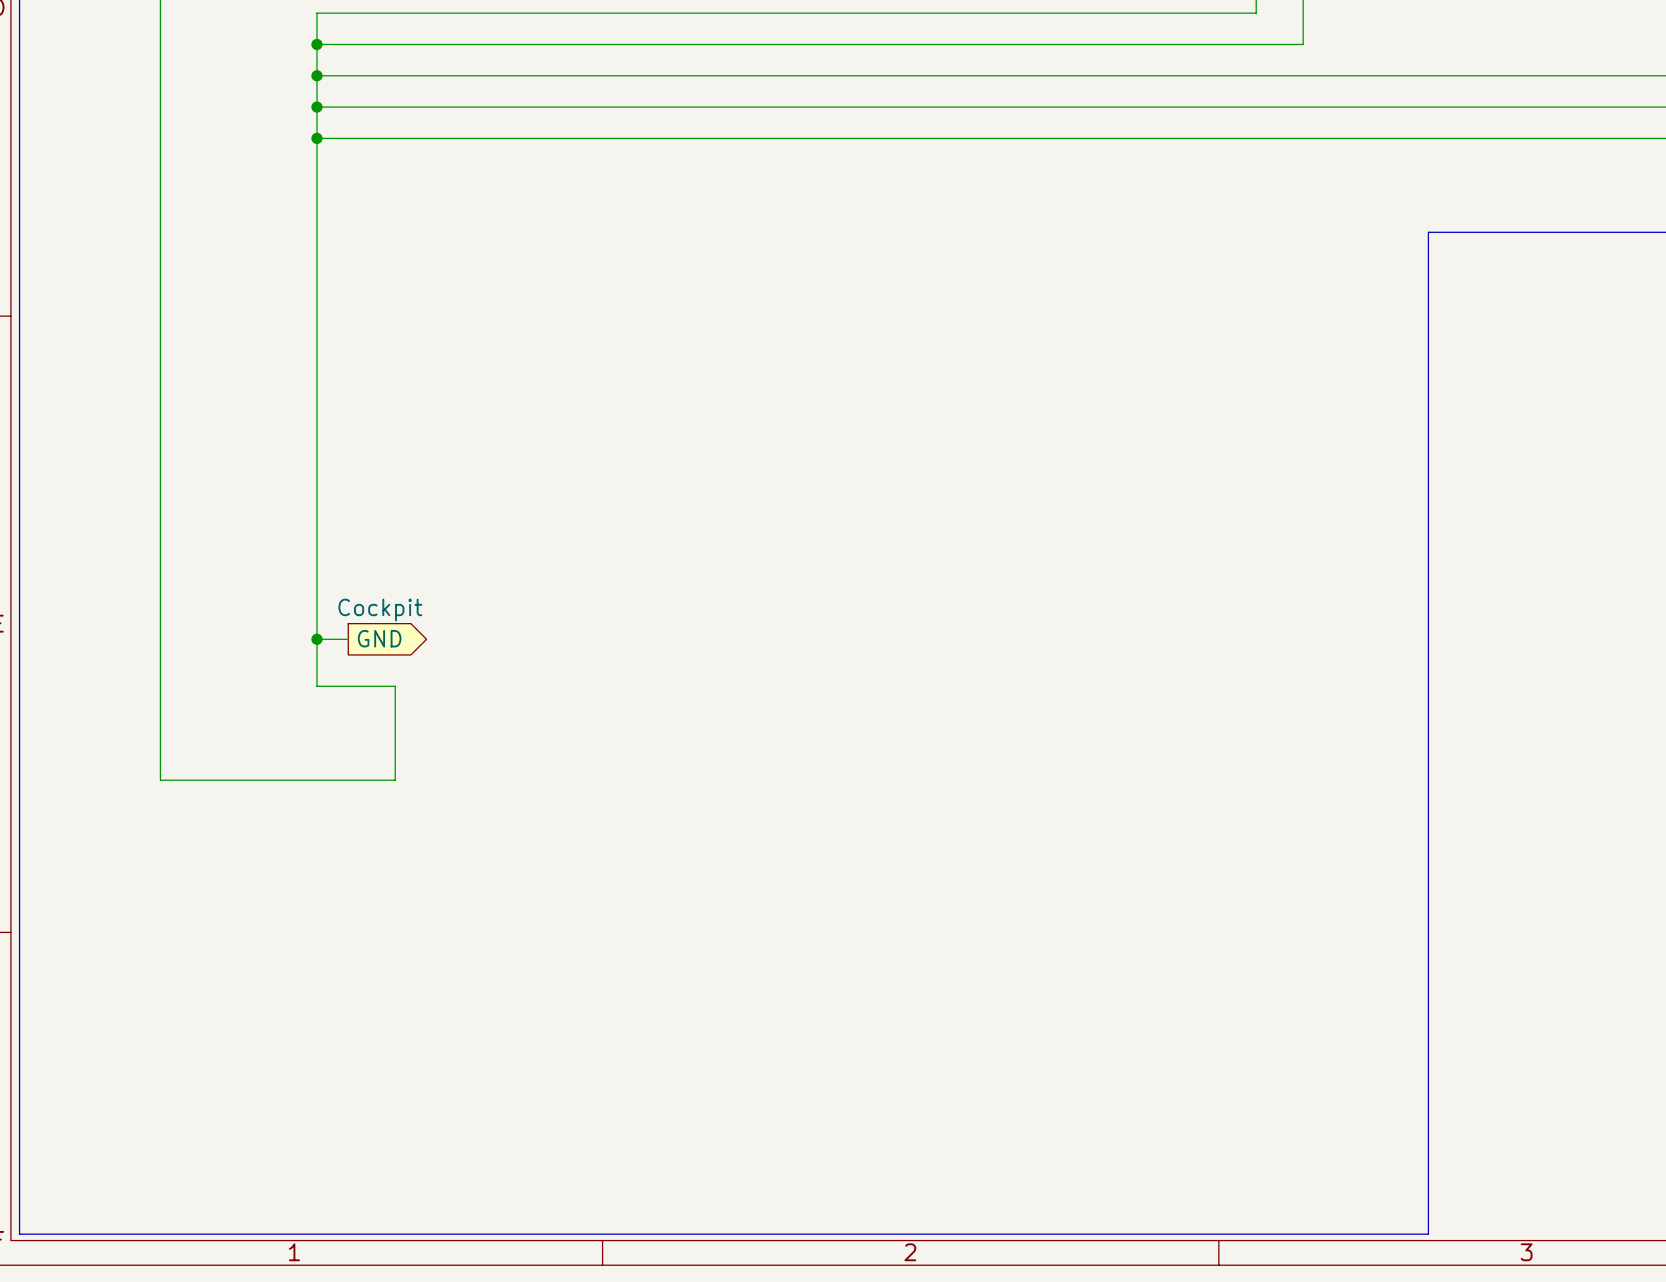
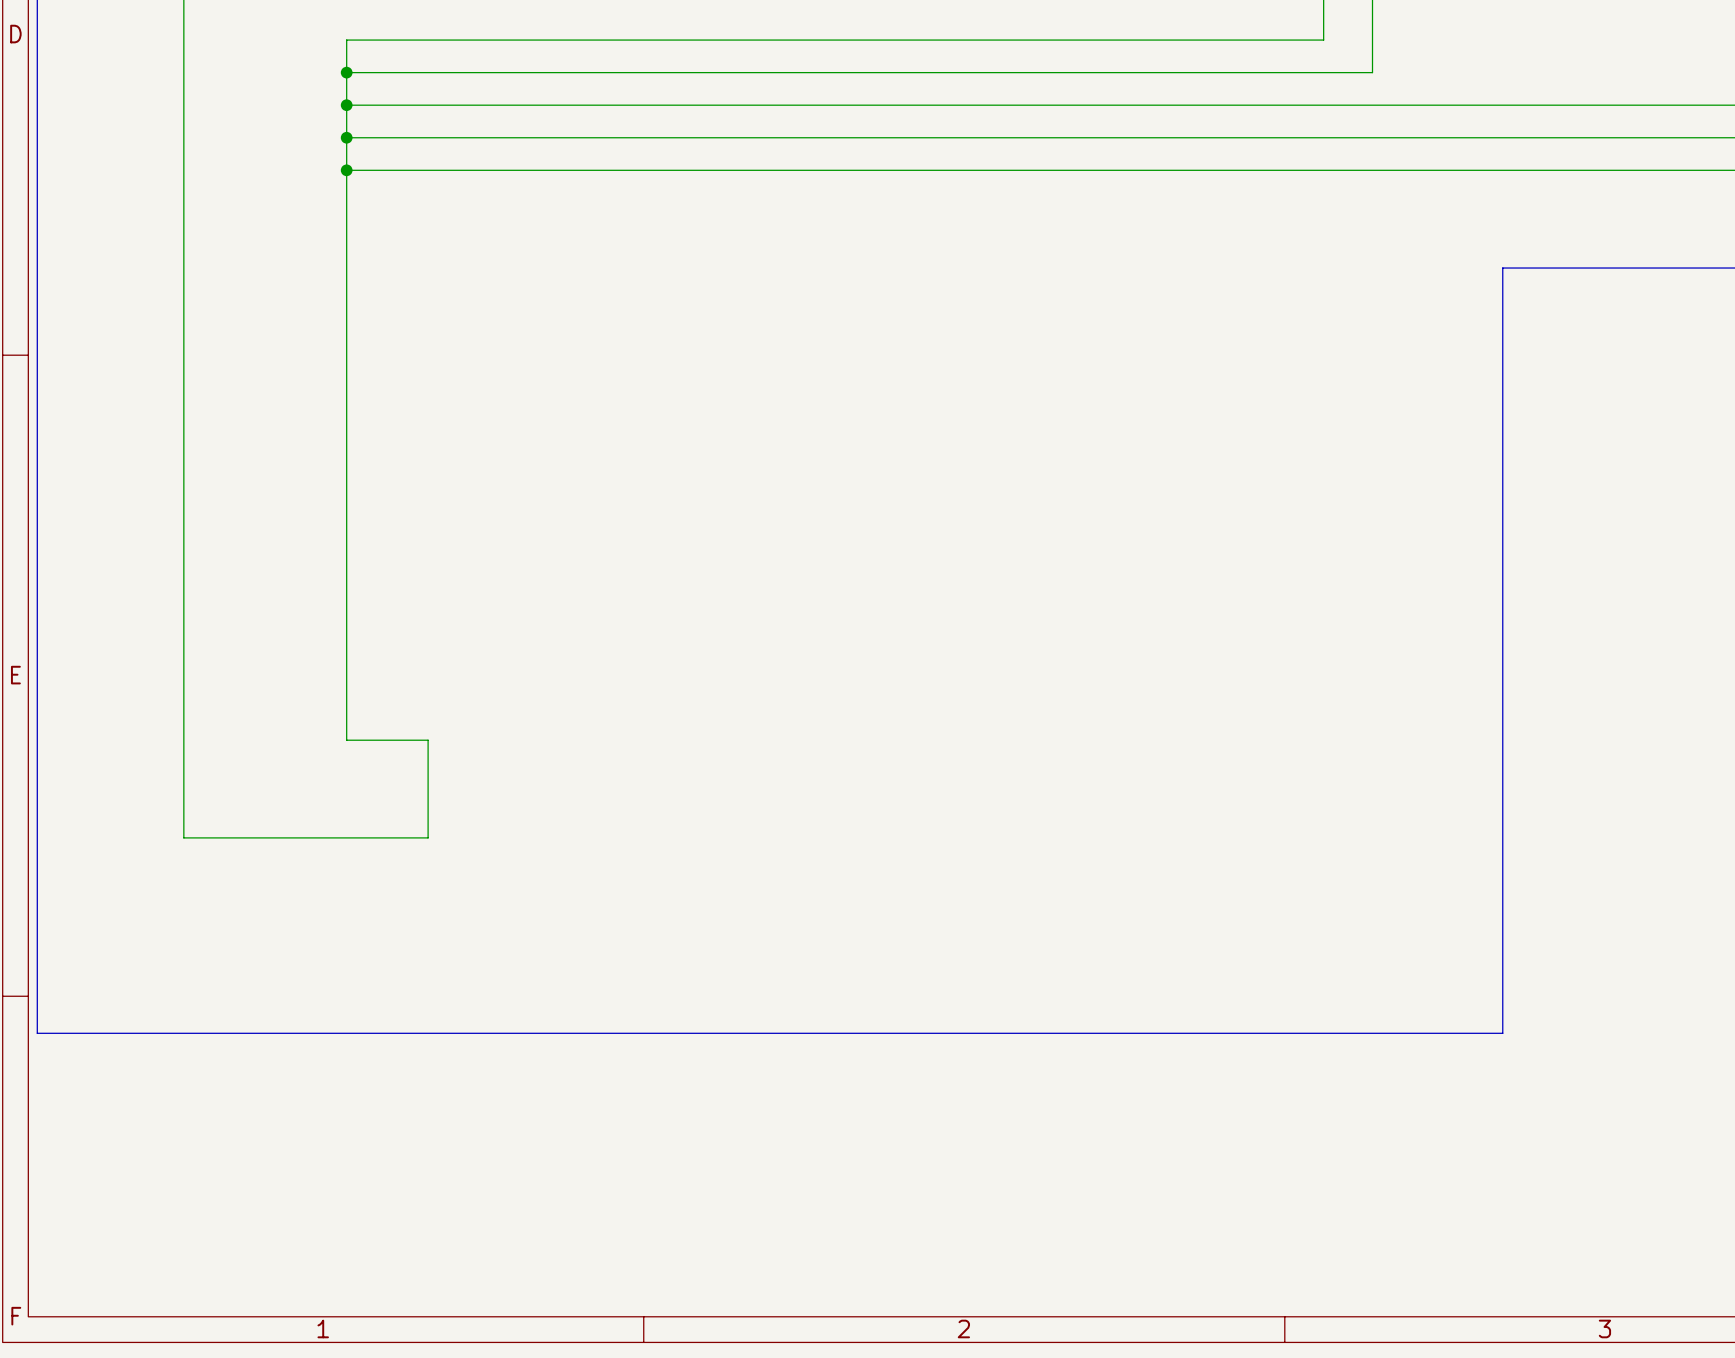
wire: (316, 639) (348, 639) -> none
junction: (316, 639) -> none
part: (387, 639) -> none
line: (19, 968) (19, 1234) (1428, 1234) (1428, 968) -> (37, 1033) (1502, 1033)

